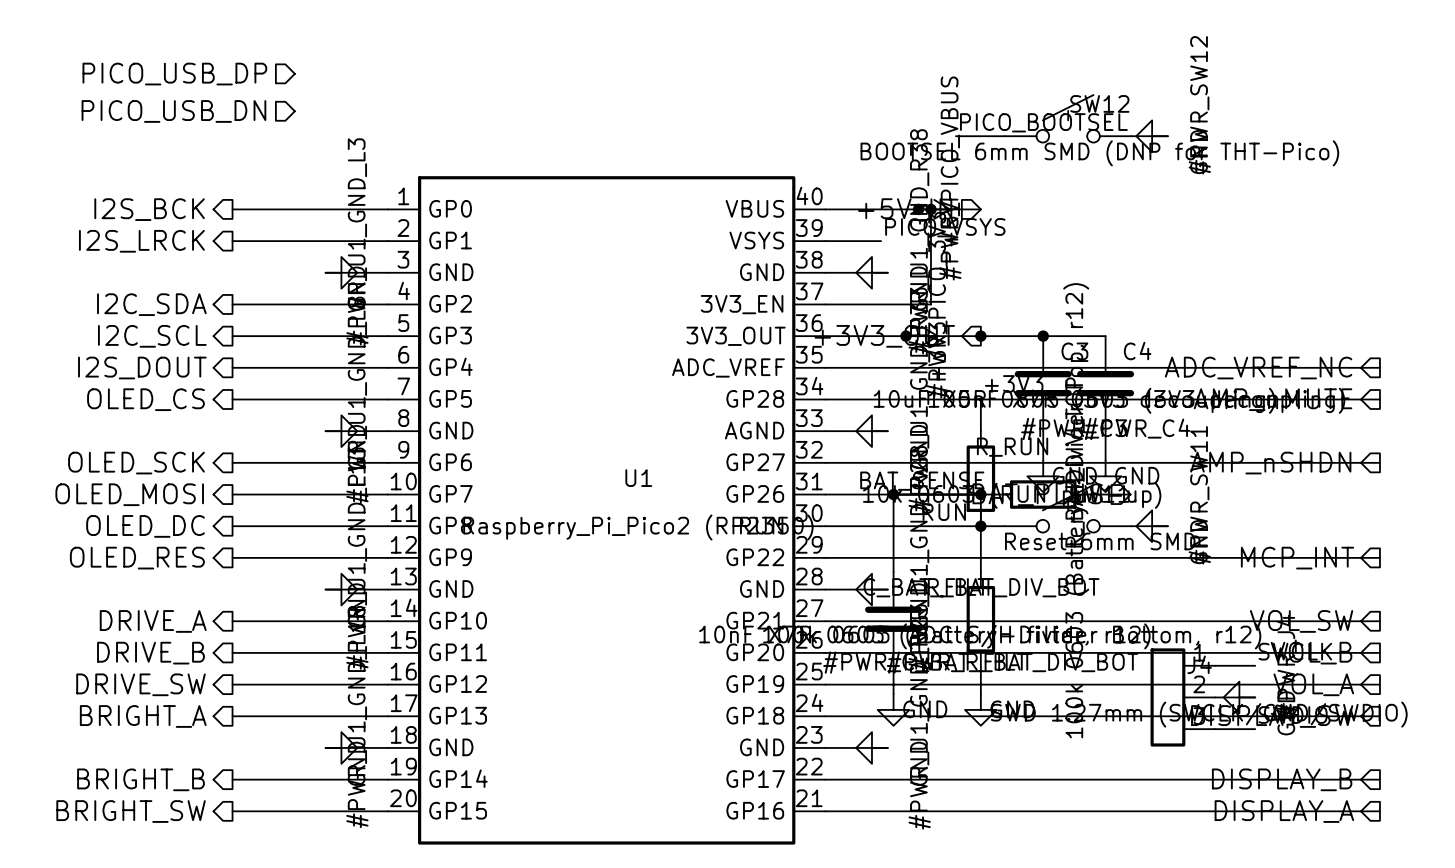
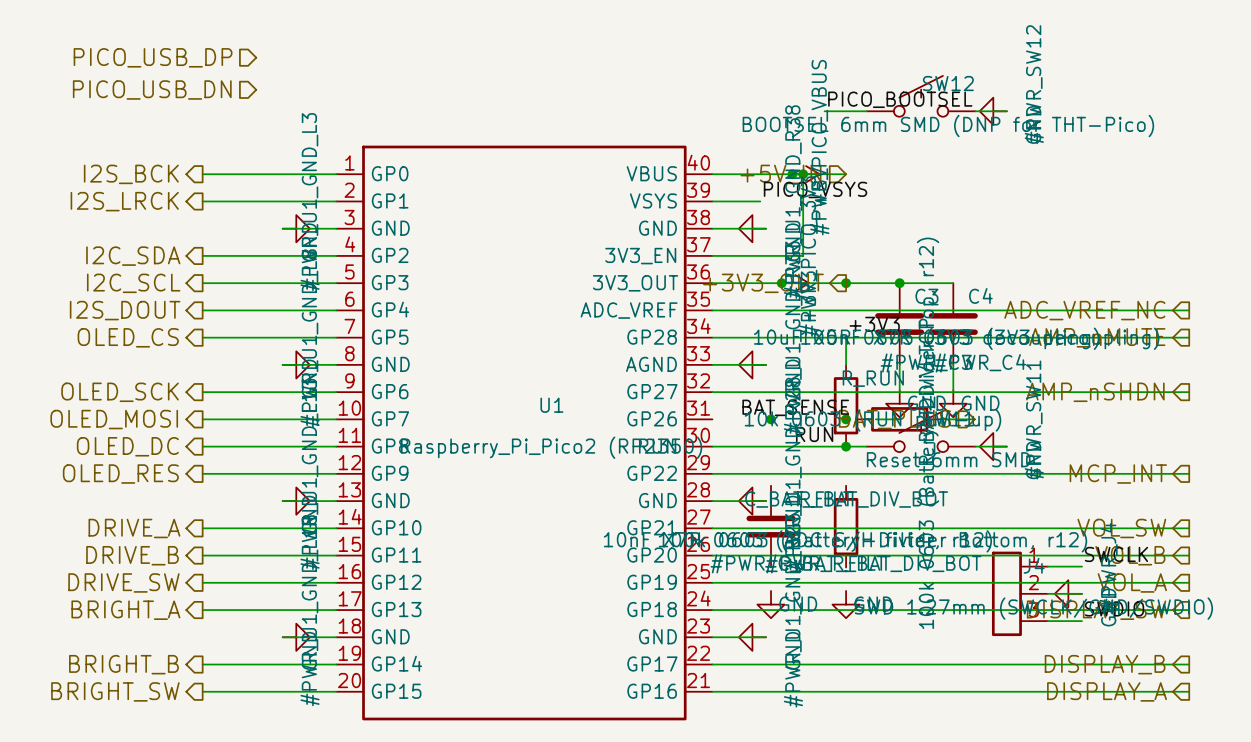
wire: (825, 494) (995, 494) -> none
wire: (893, 494) (893, 571) -> none
wire: (980, 494) (980, 571) -> none
wire: none -> (875, 419) (899, 419)
wire: (893, 666) (893, 694) -> none
wire: (980, 666) (980, 694) -> none

